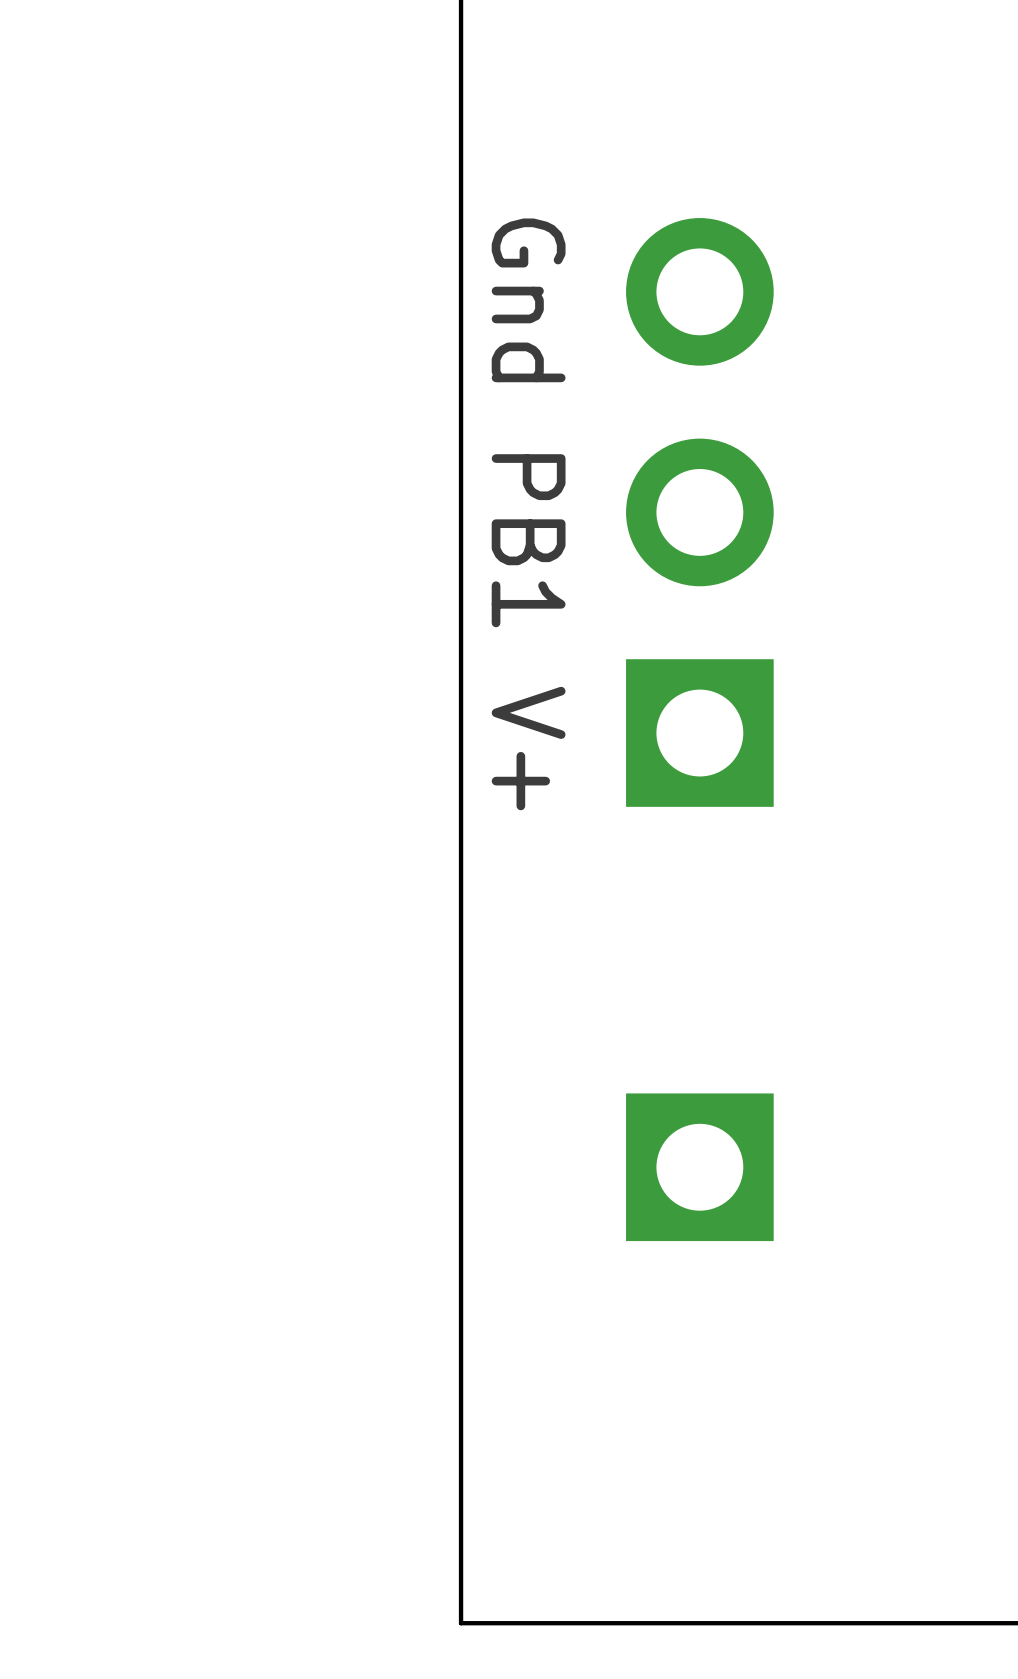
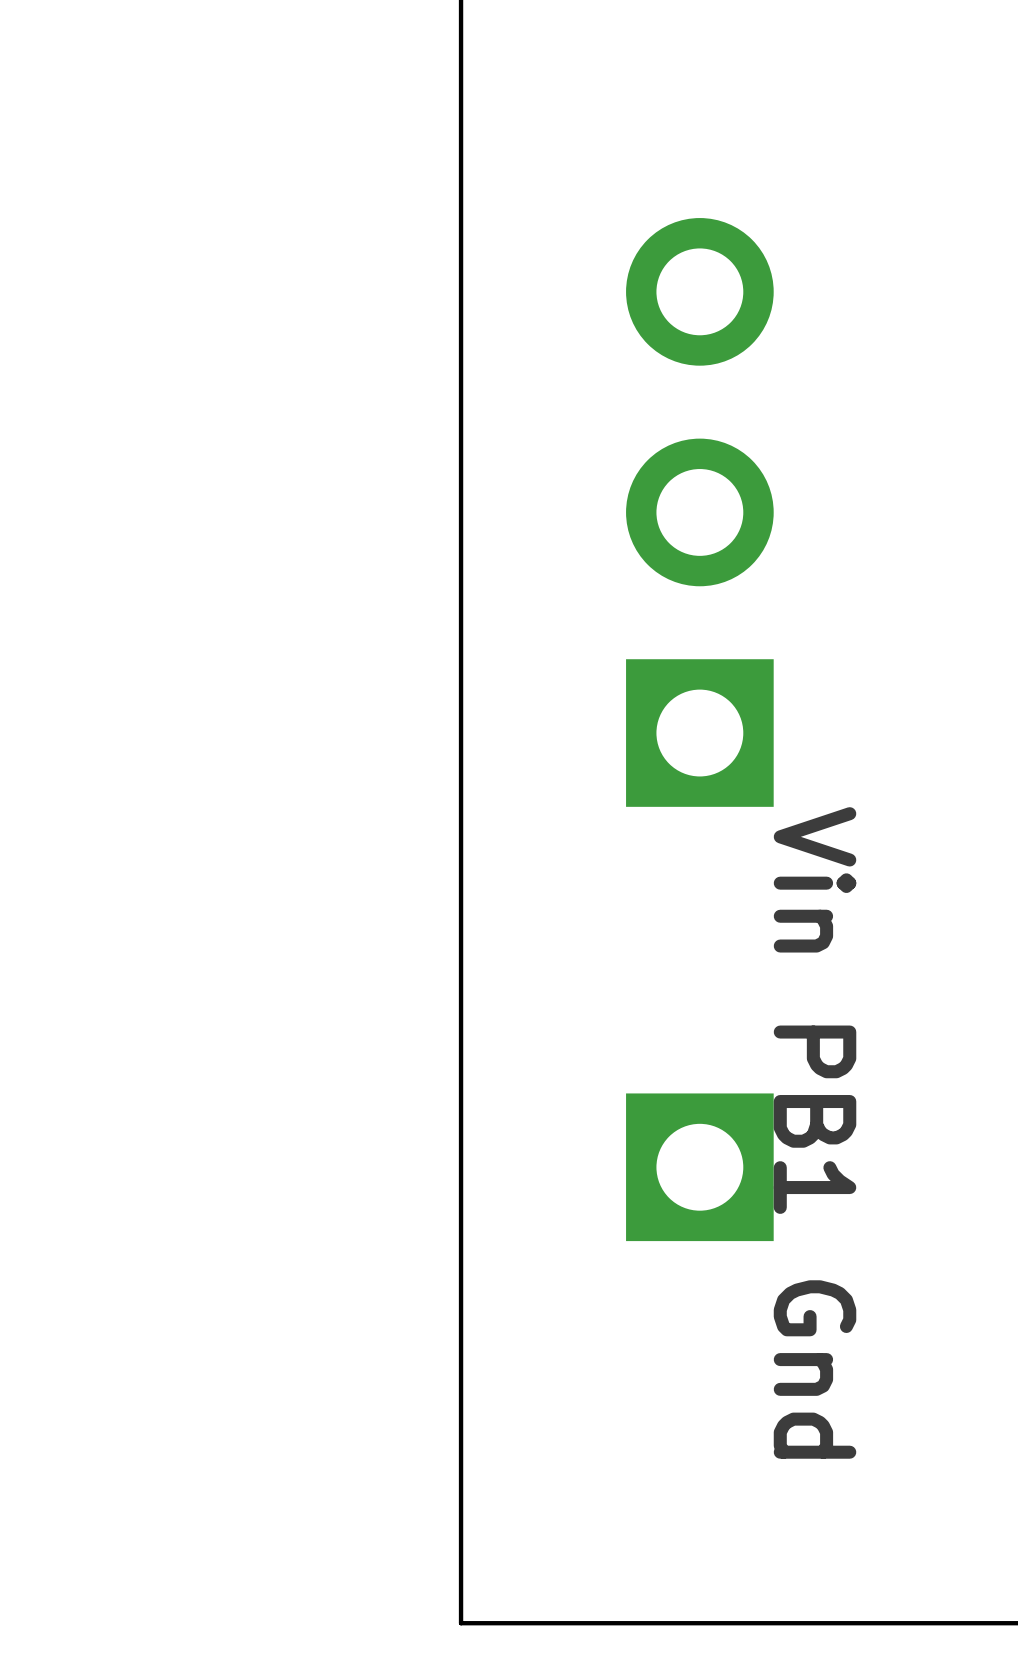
text: Gnd PB1 V+ (528, 514) -> none
text: none -> Vin PB1 Gnd (815, 1132)

